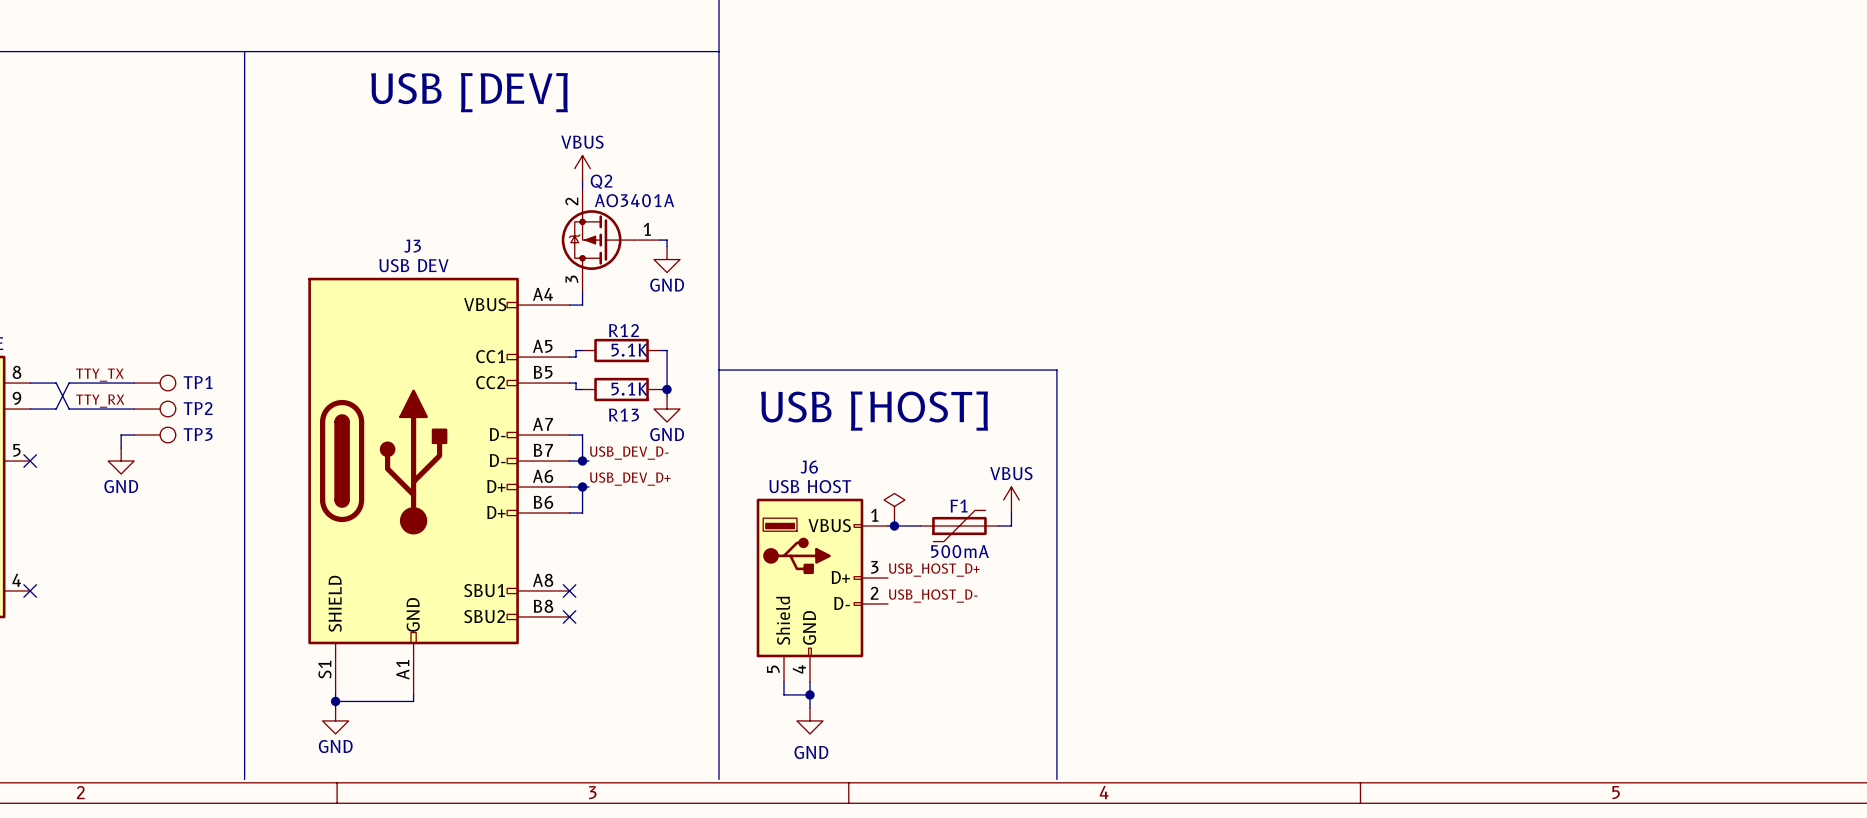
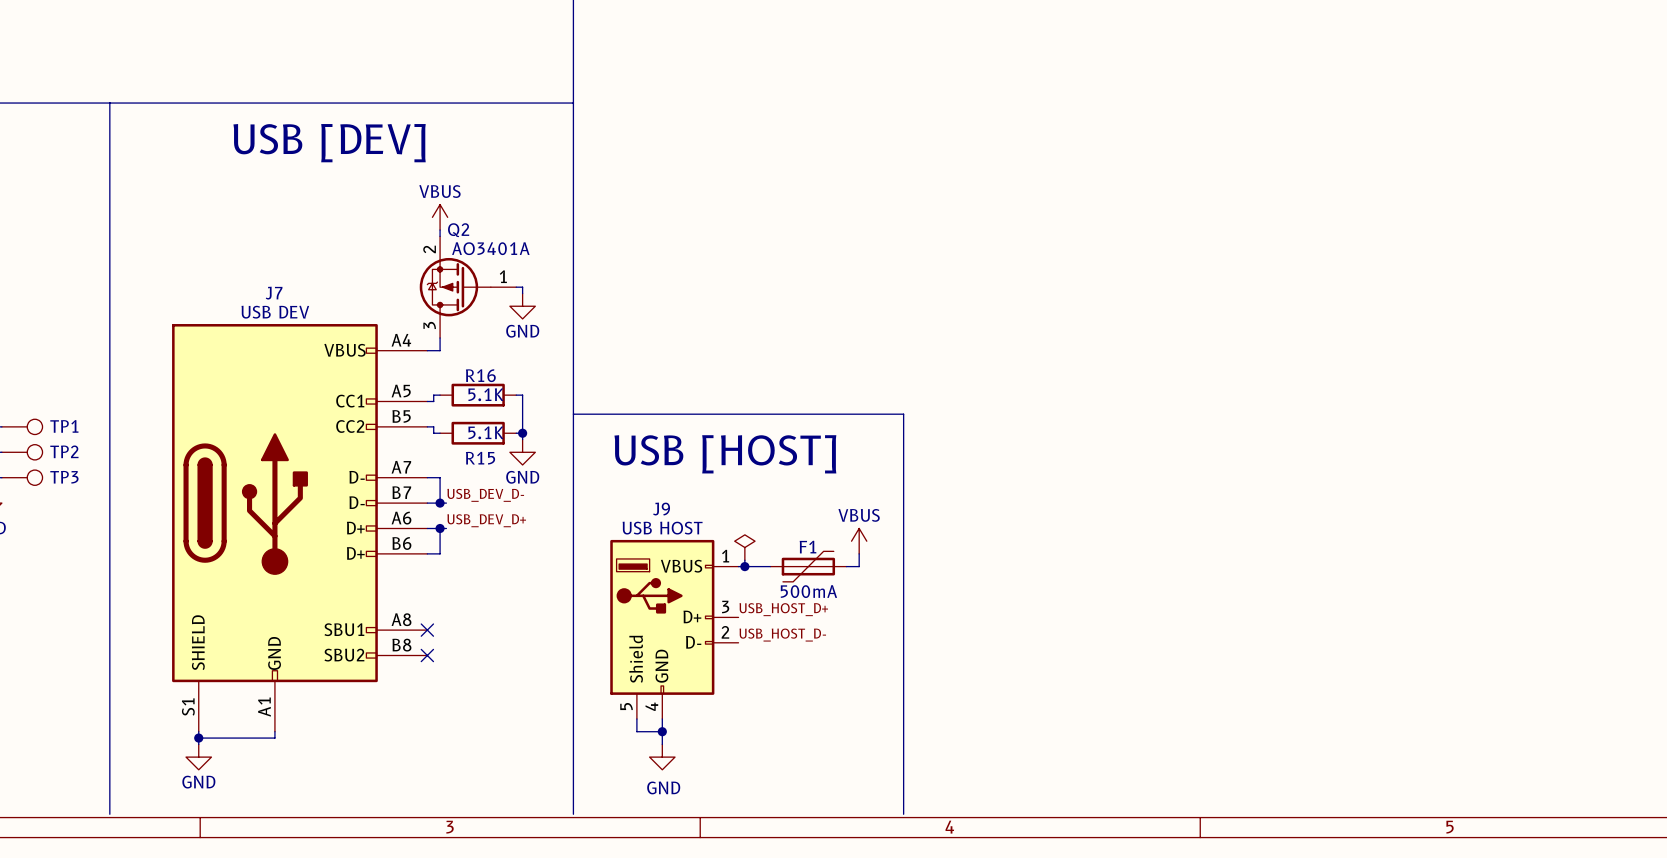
J3 name: J3 (412, 246) -> J7 (274, 293)
R12 name: R12 (623, 330) -> R16 (480, 375)
R13 name: R13 (623, 415) -> R15 (480, 458)
J6 name: J6 (809, 467) -> J9 (661, 509)

